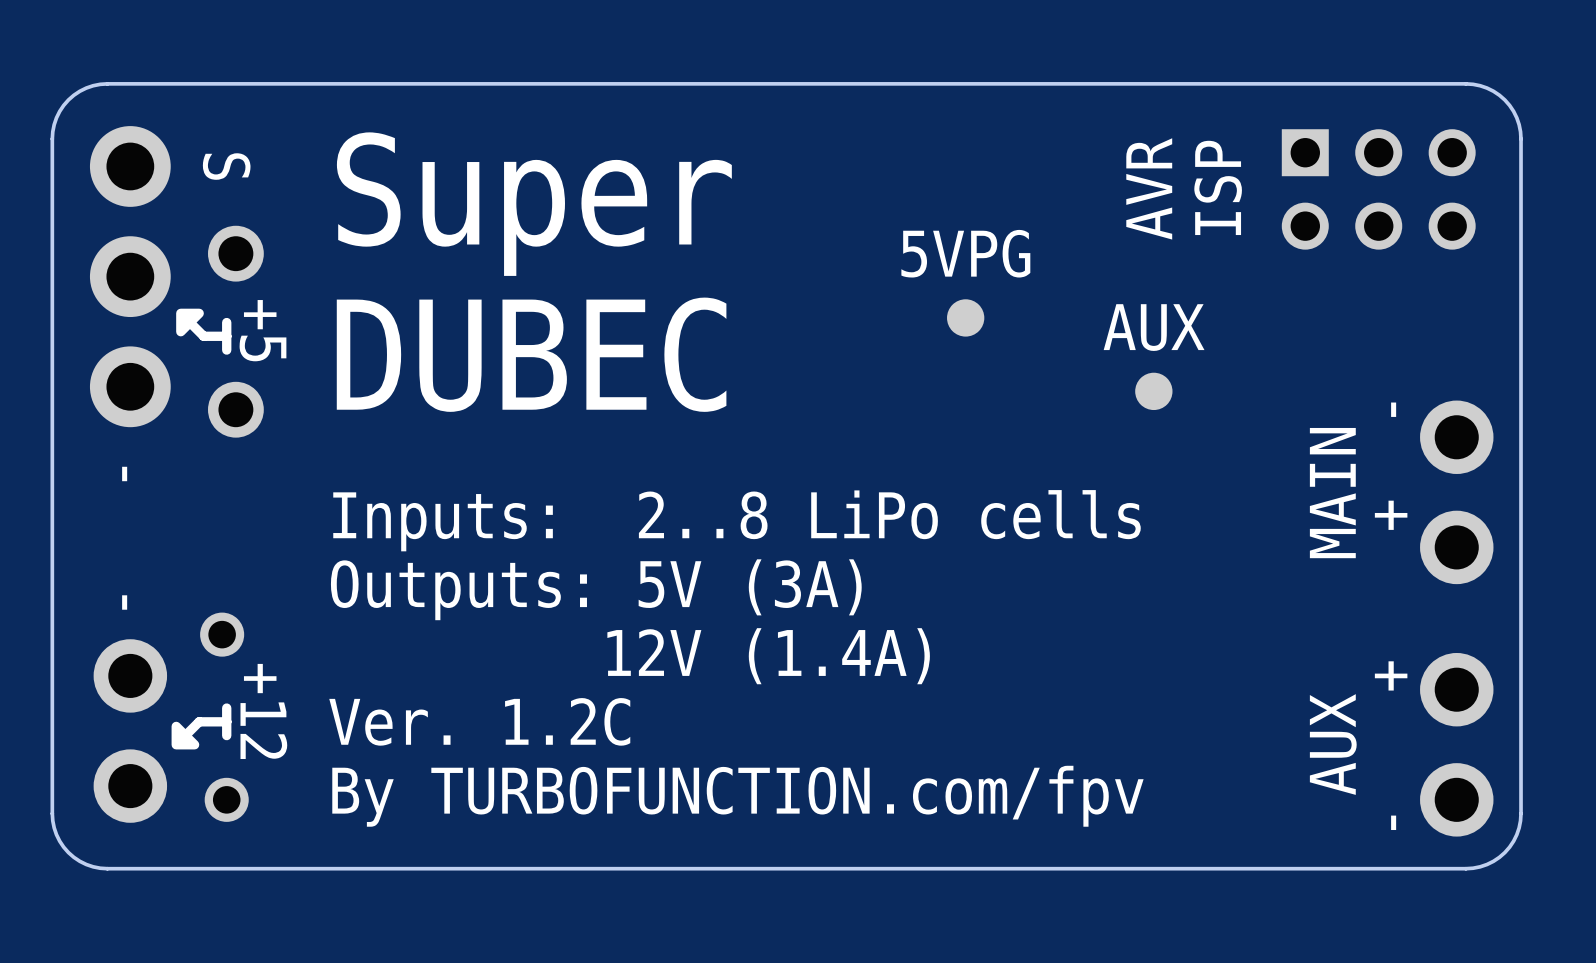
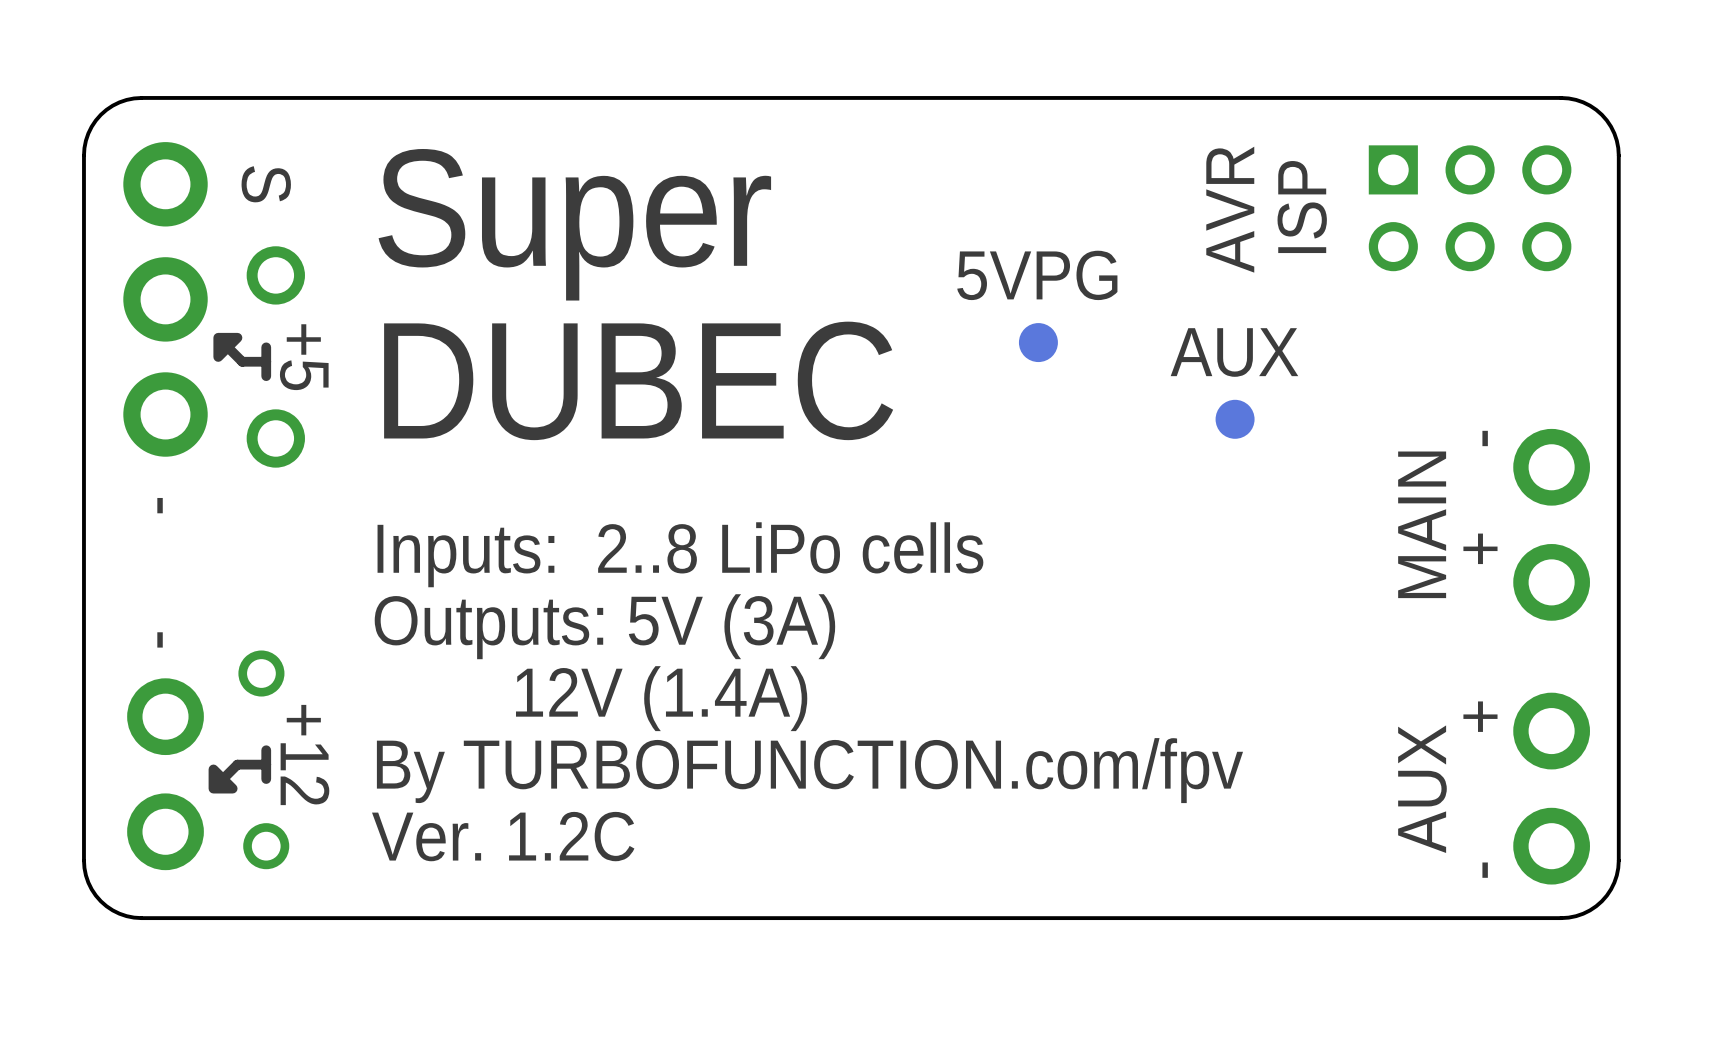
text: Ver. 1.2C (479, 721) -> By TURBOFUNCTION.com/fpv (809, 770)
text: By TURBOFUNCTION.com/fpv (737, 796) -> Ver. 1.2C (503, 836)

